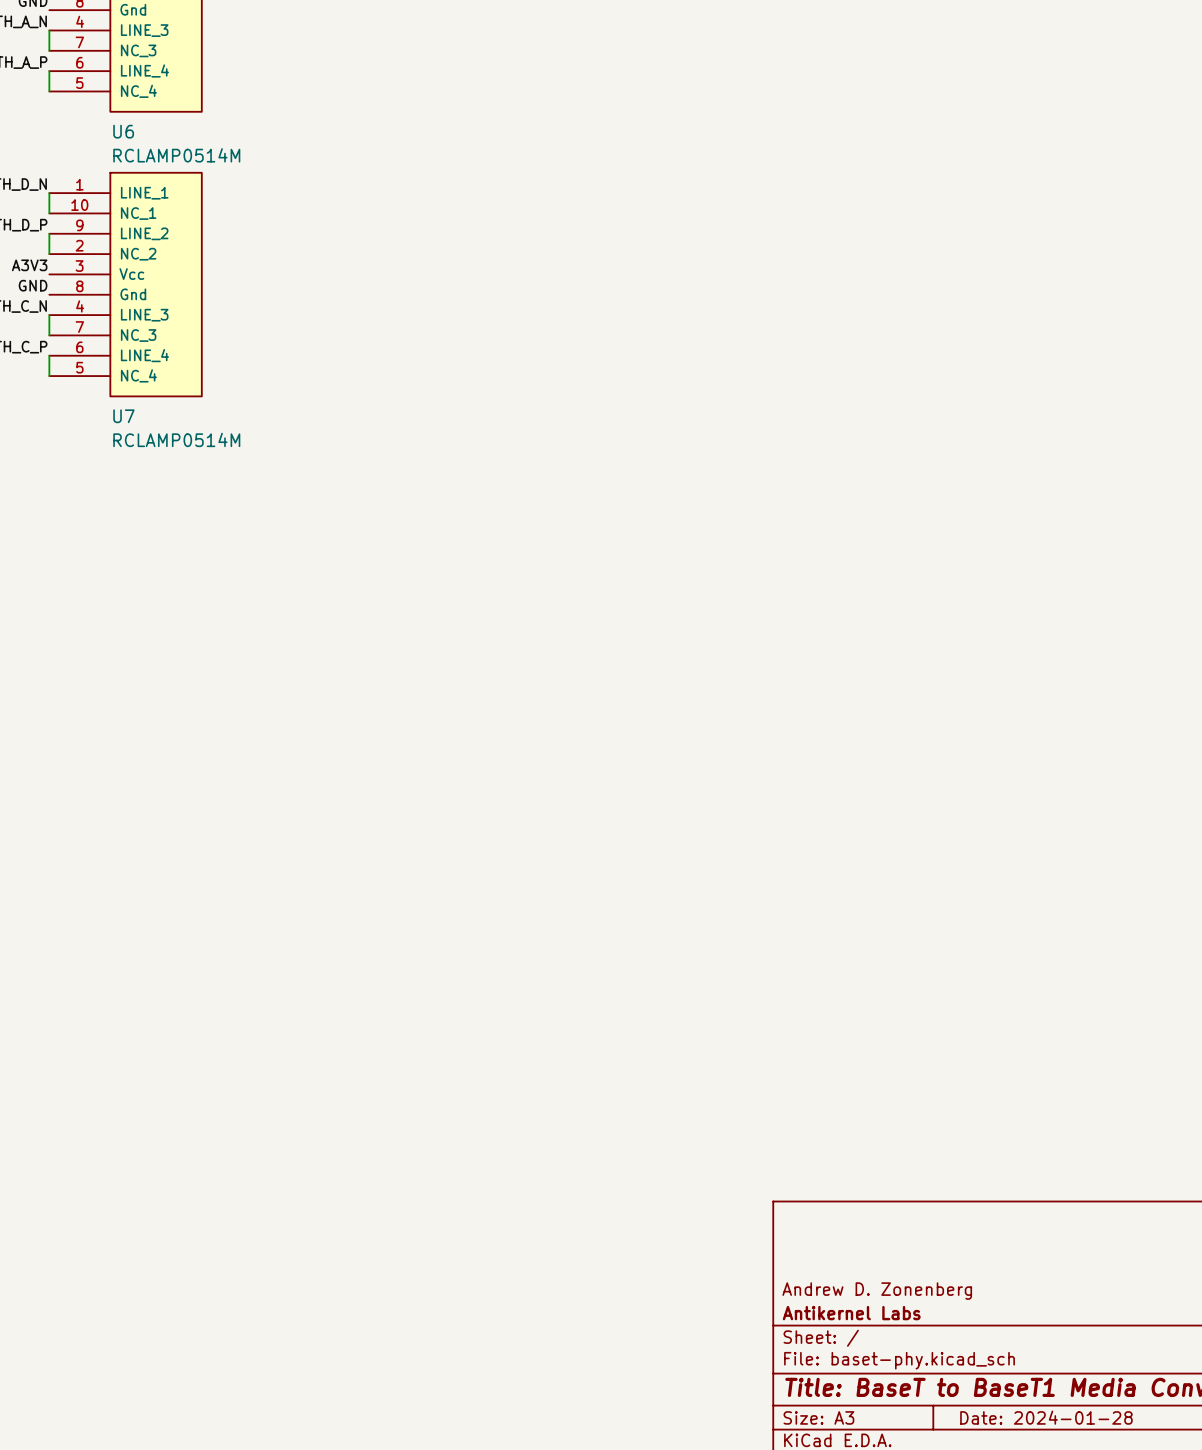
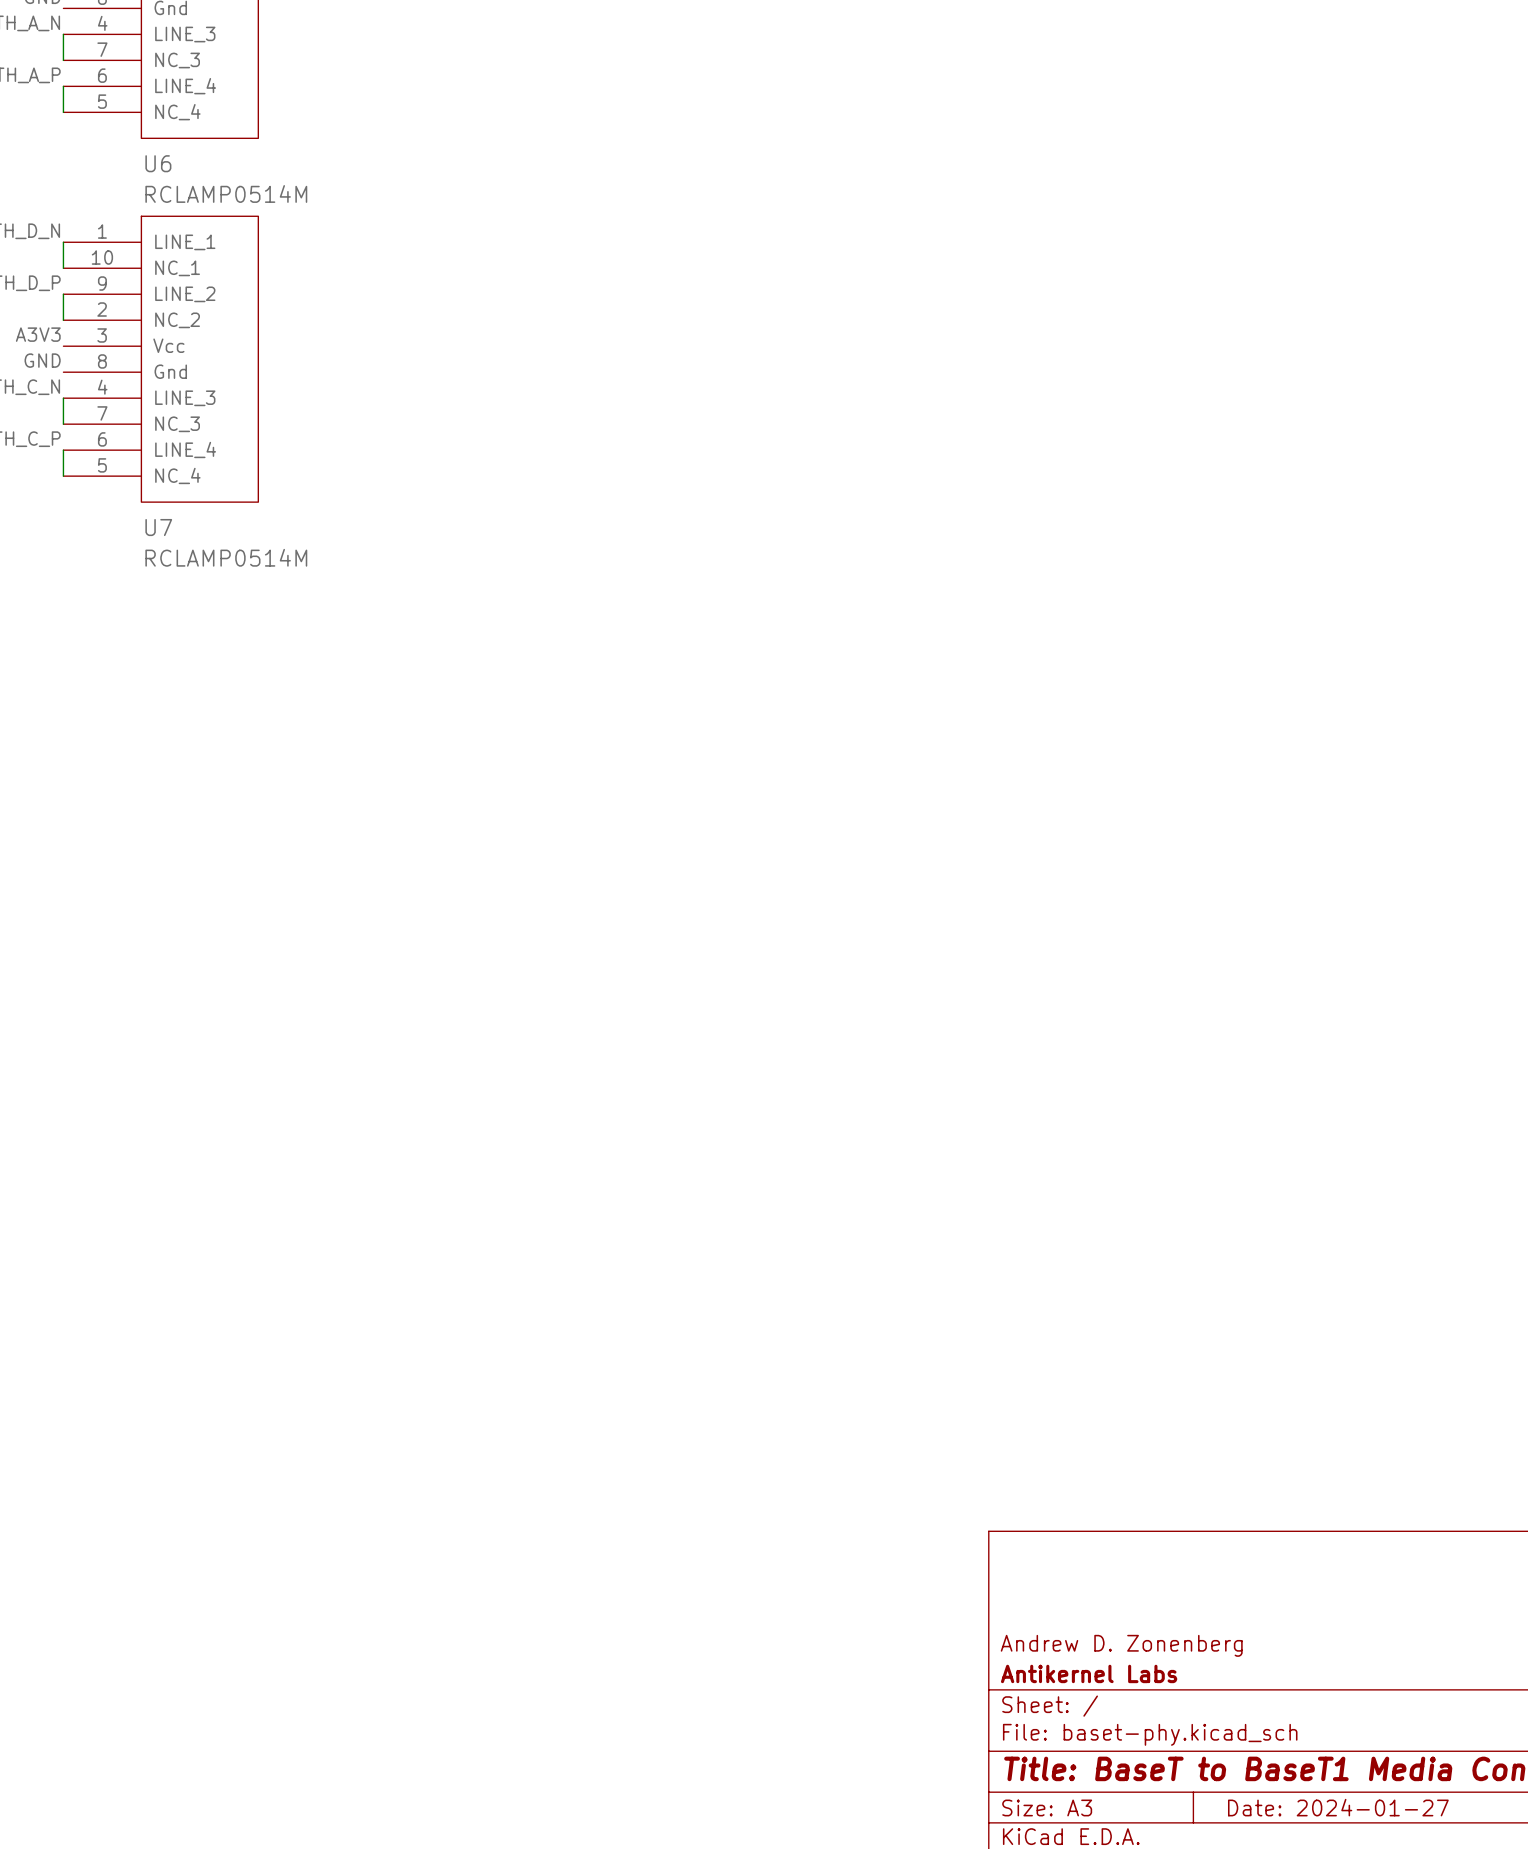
title block: Date: 2024-01-28 (1046, 1417) -> Date: 2024-01-27 (1338, 1807)

